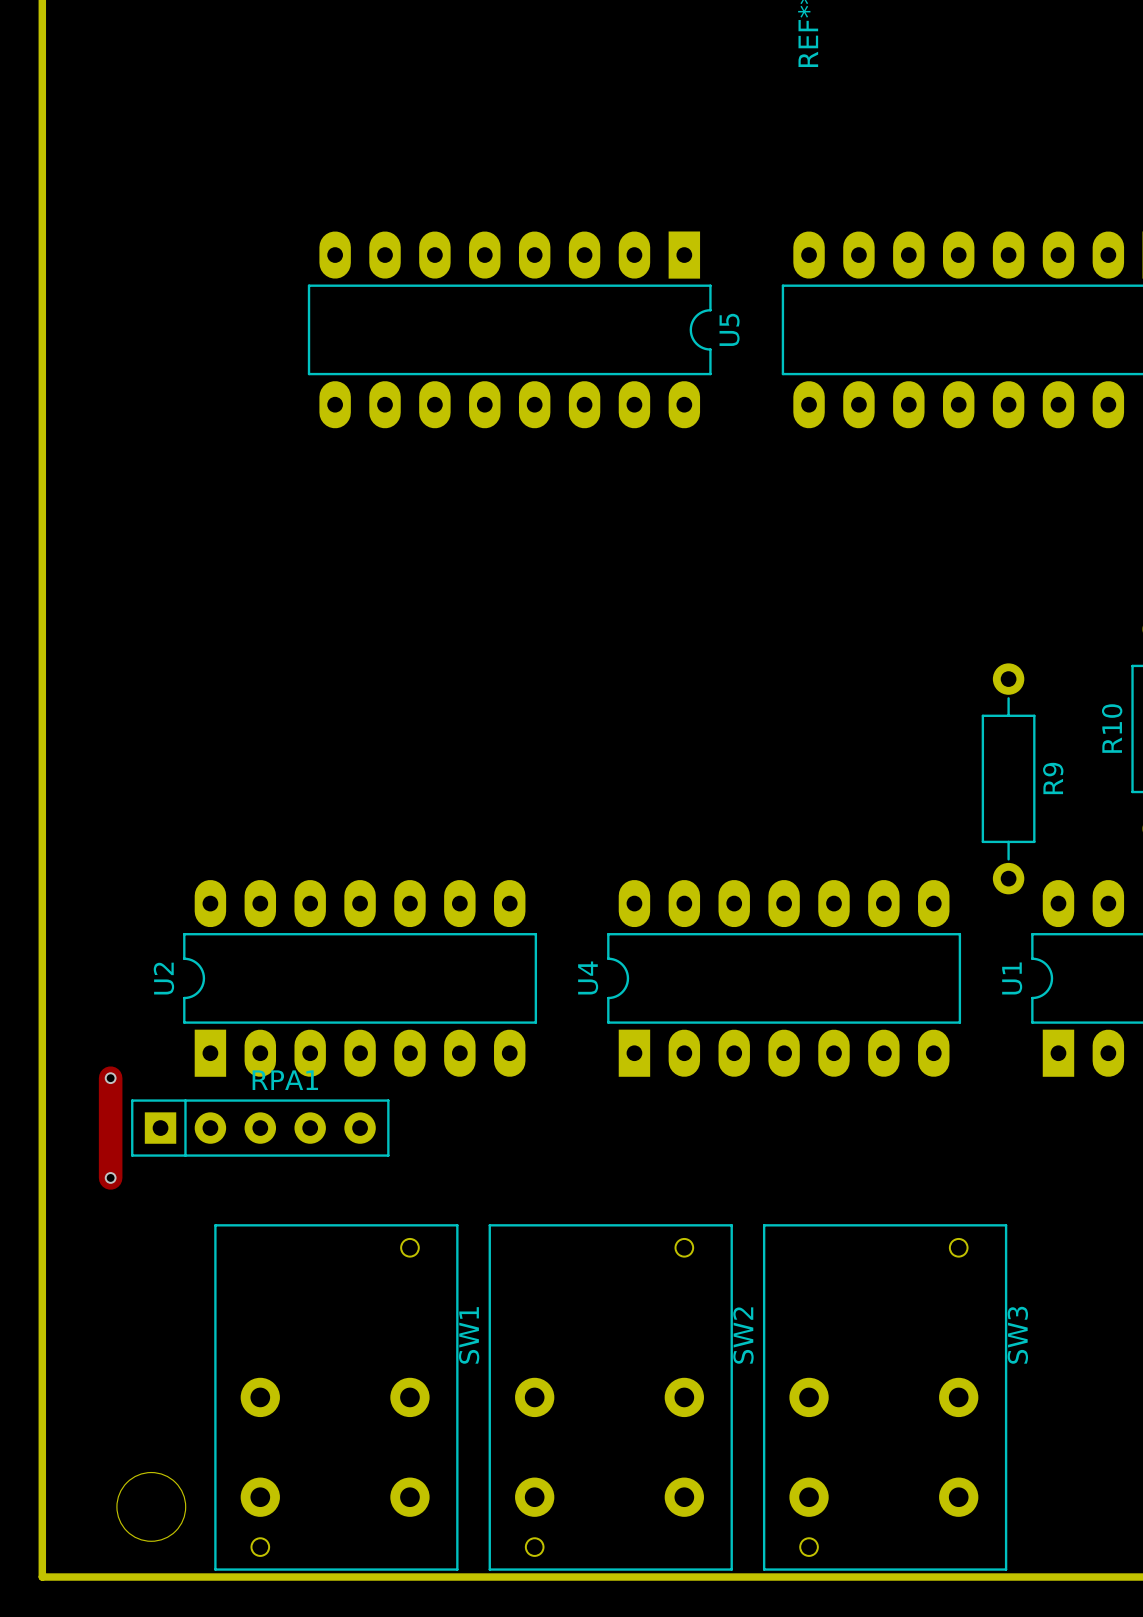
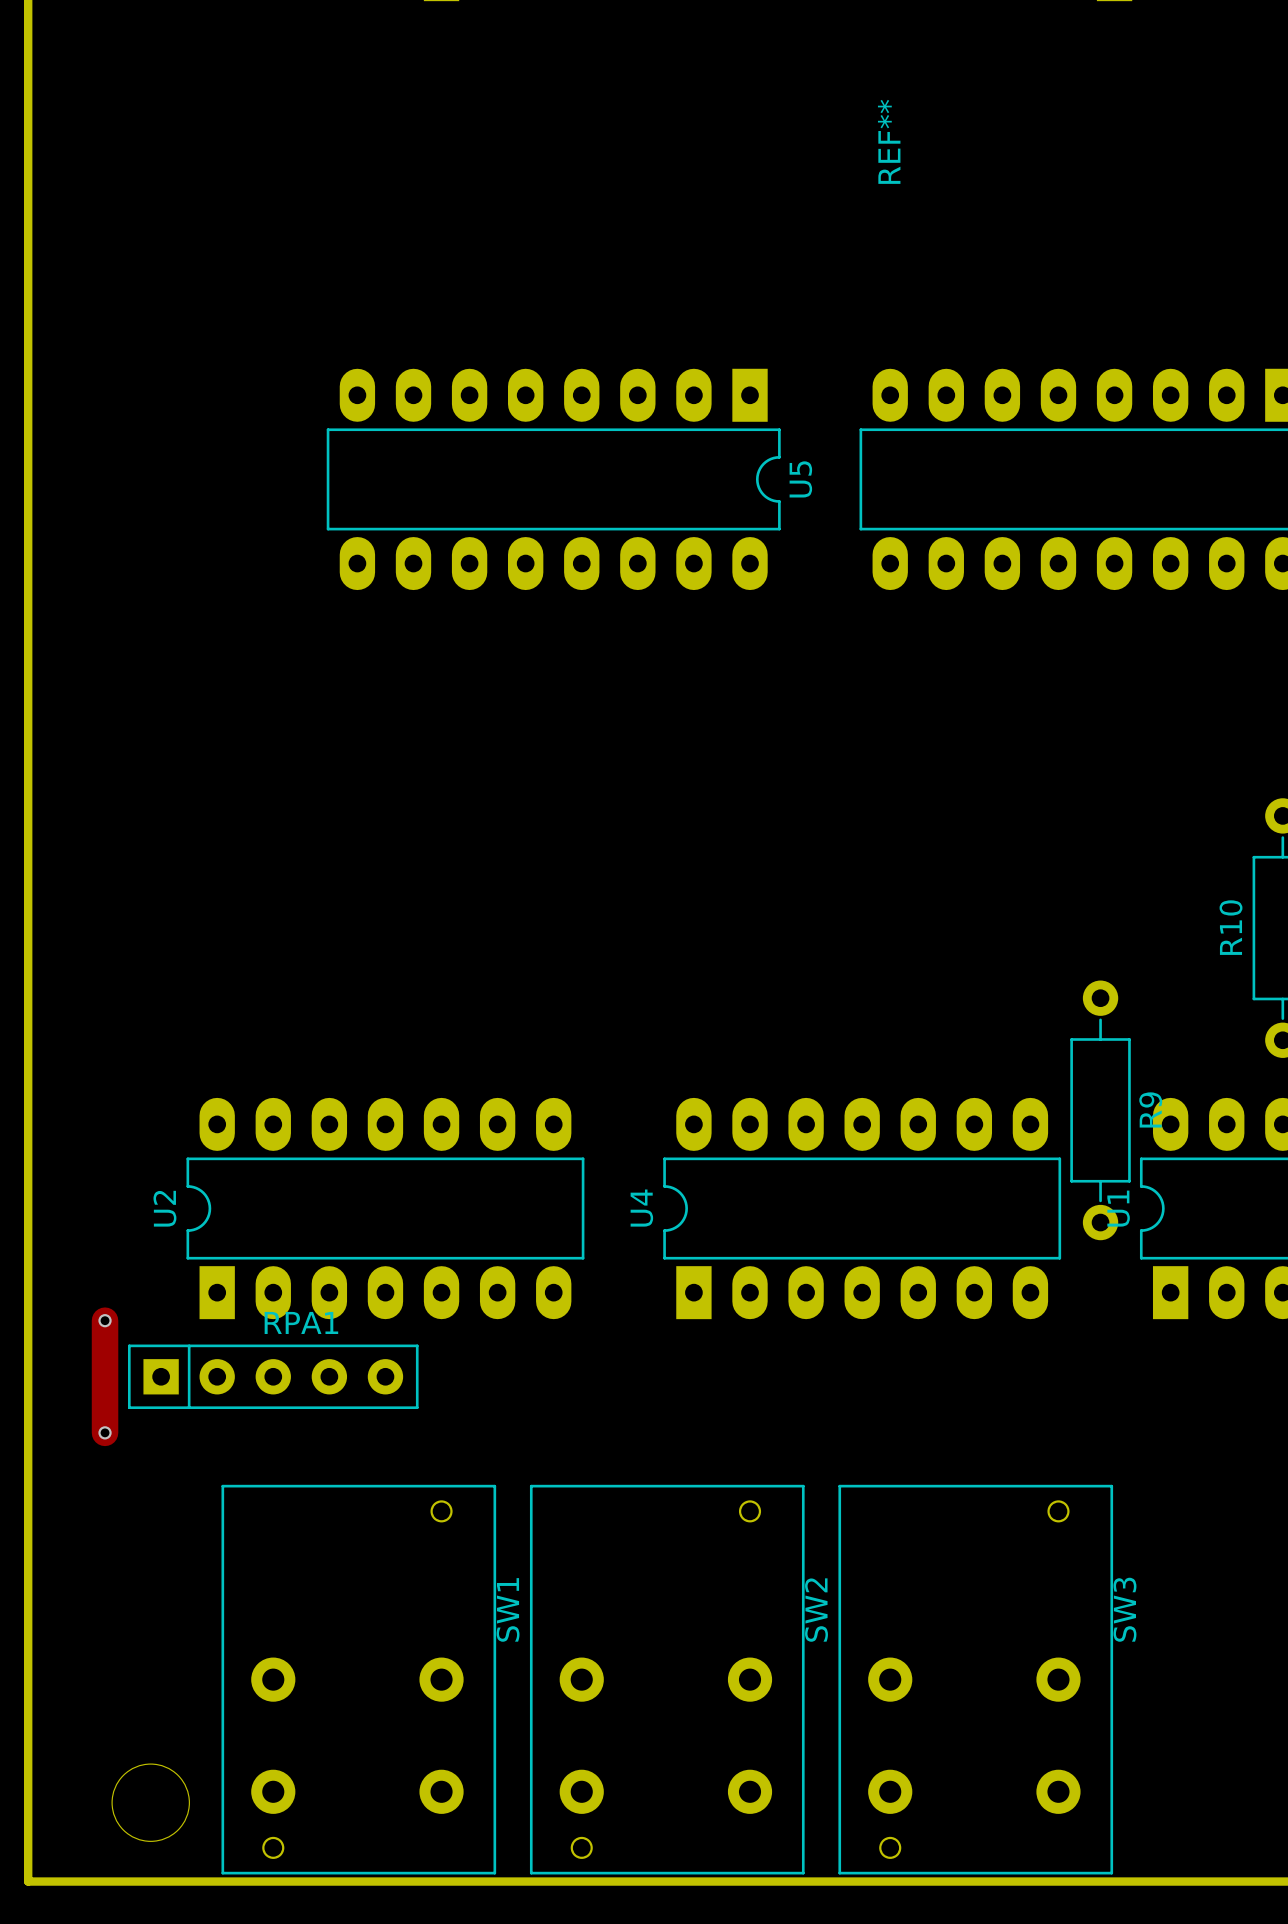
R9 position: (1008, 778) -> (1100, 1110)

